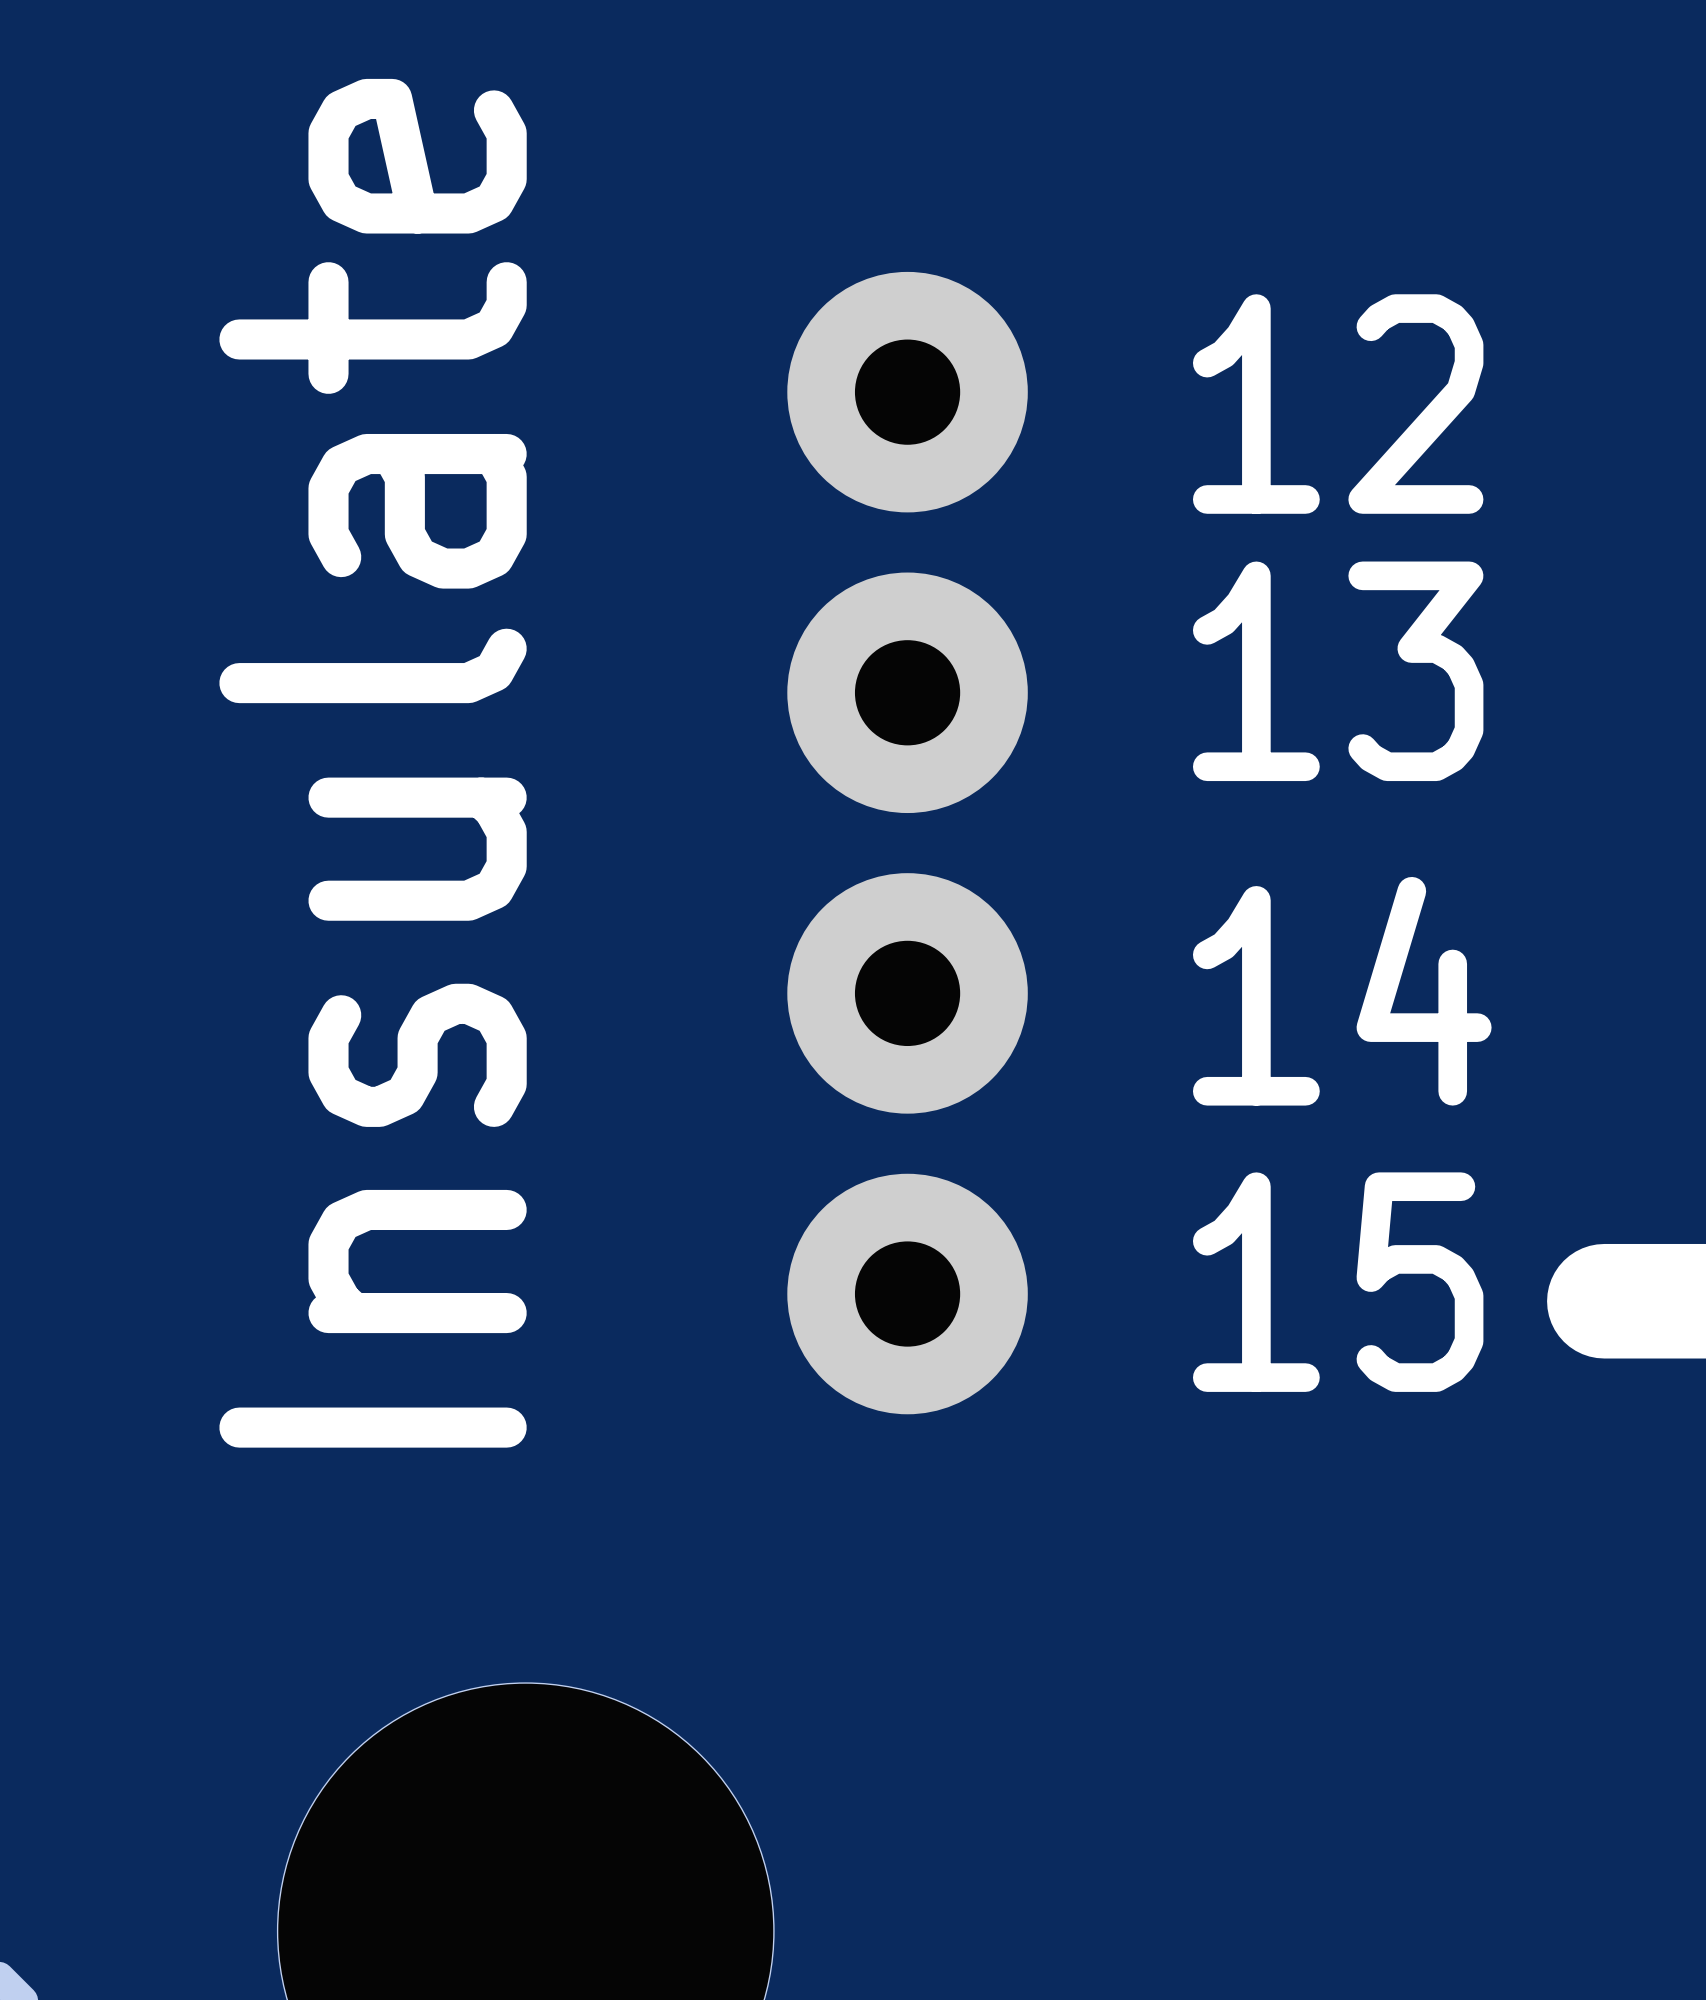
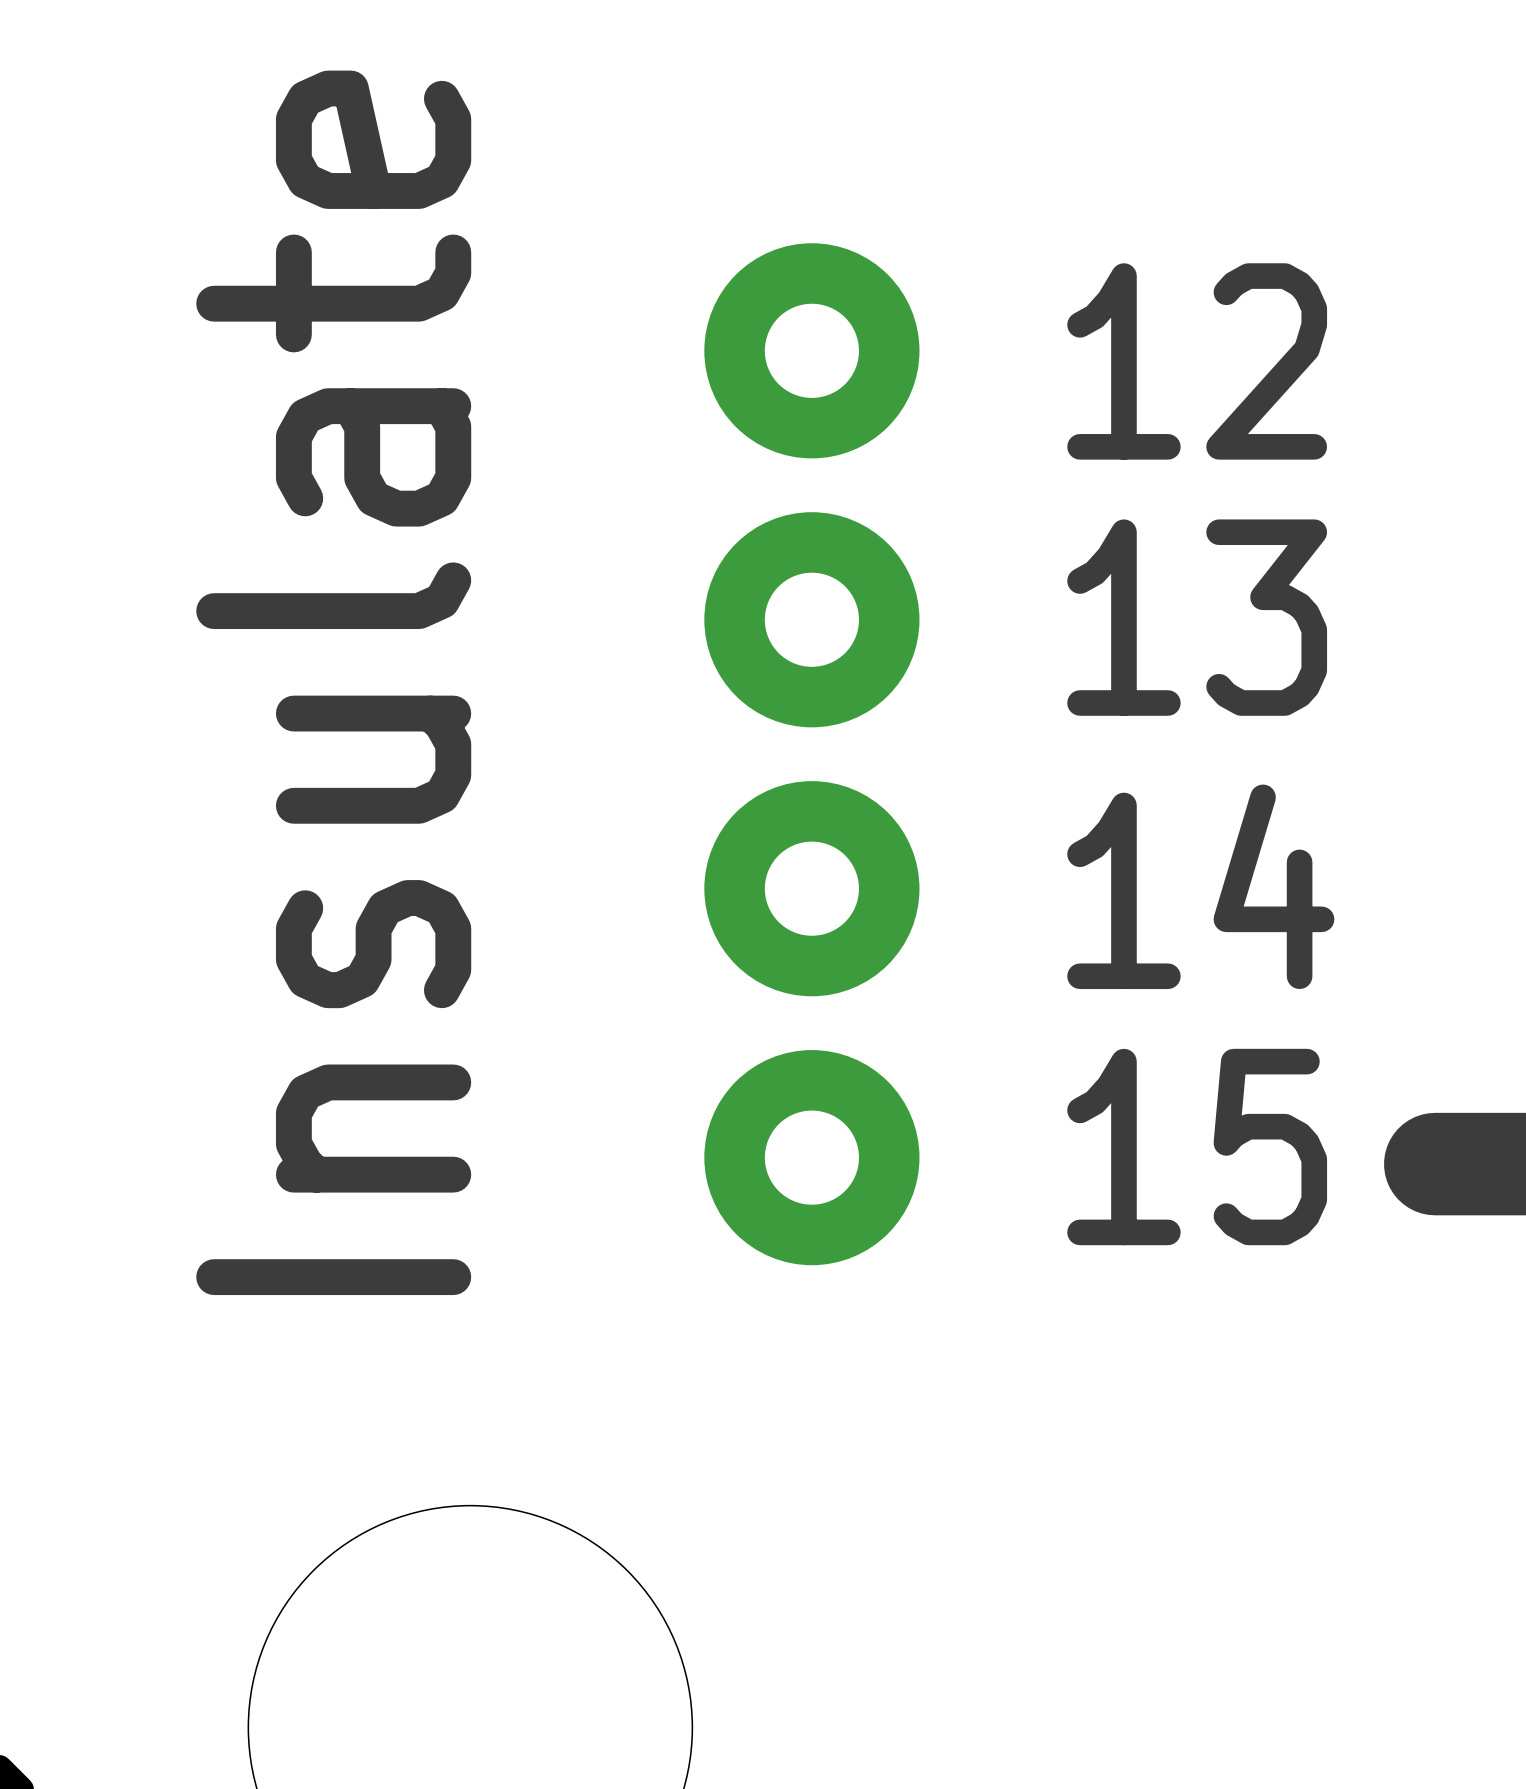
text position: 13 (1338, 671) -> 13 (1197, 617)

